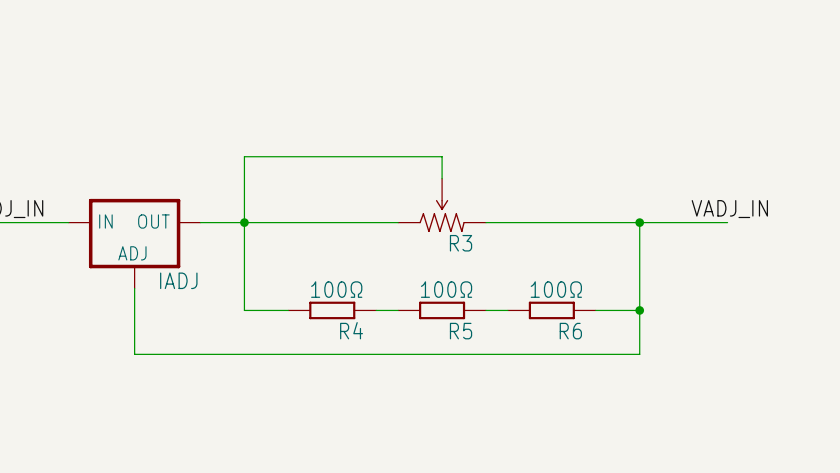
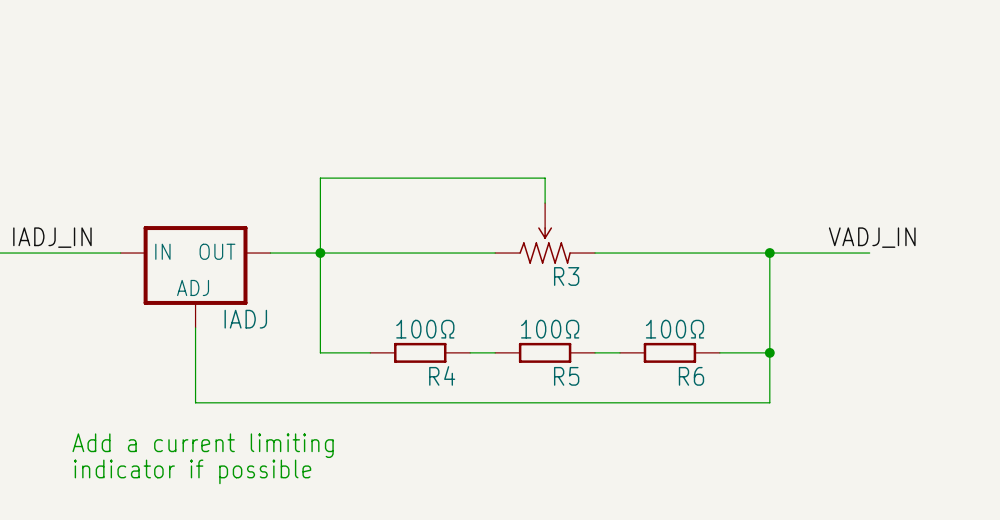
text: none -> Add a current limiting (203, 445)
text: none -> indicator if possible (192, 471)

